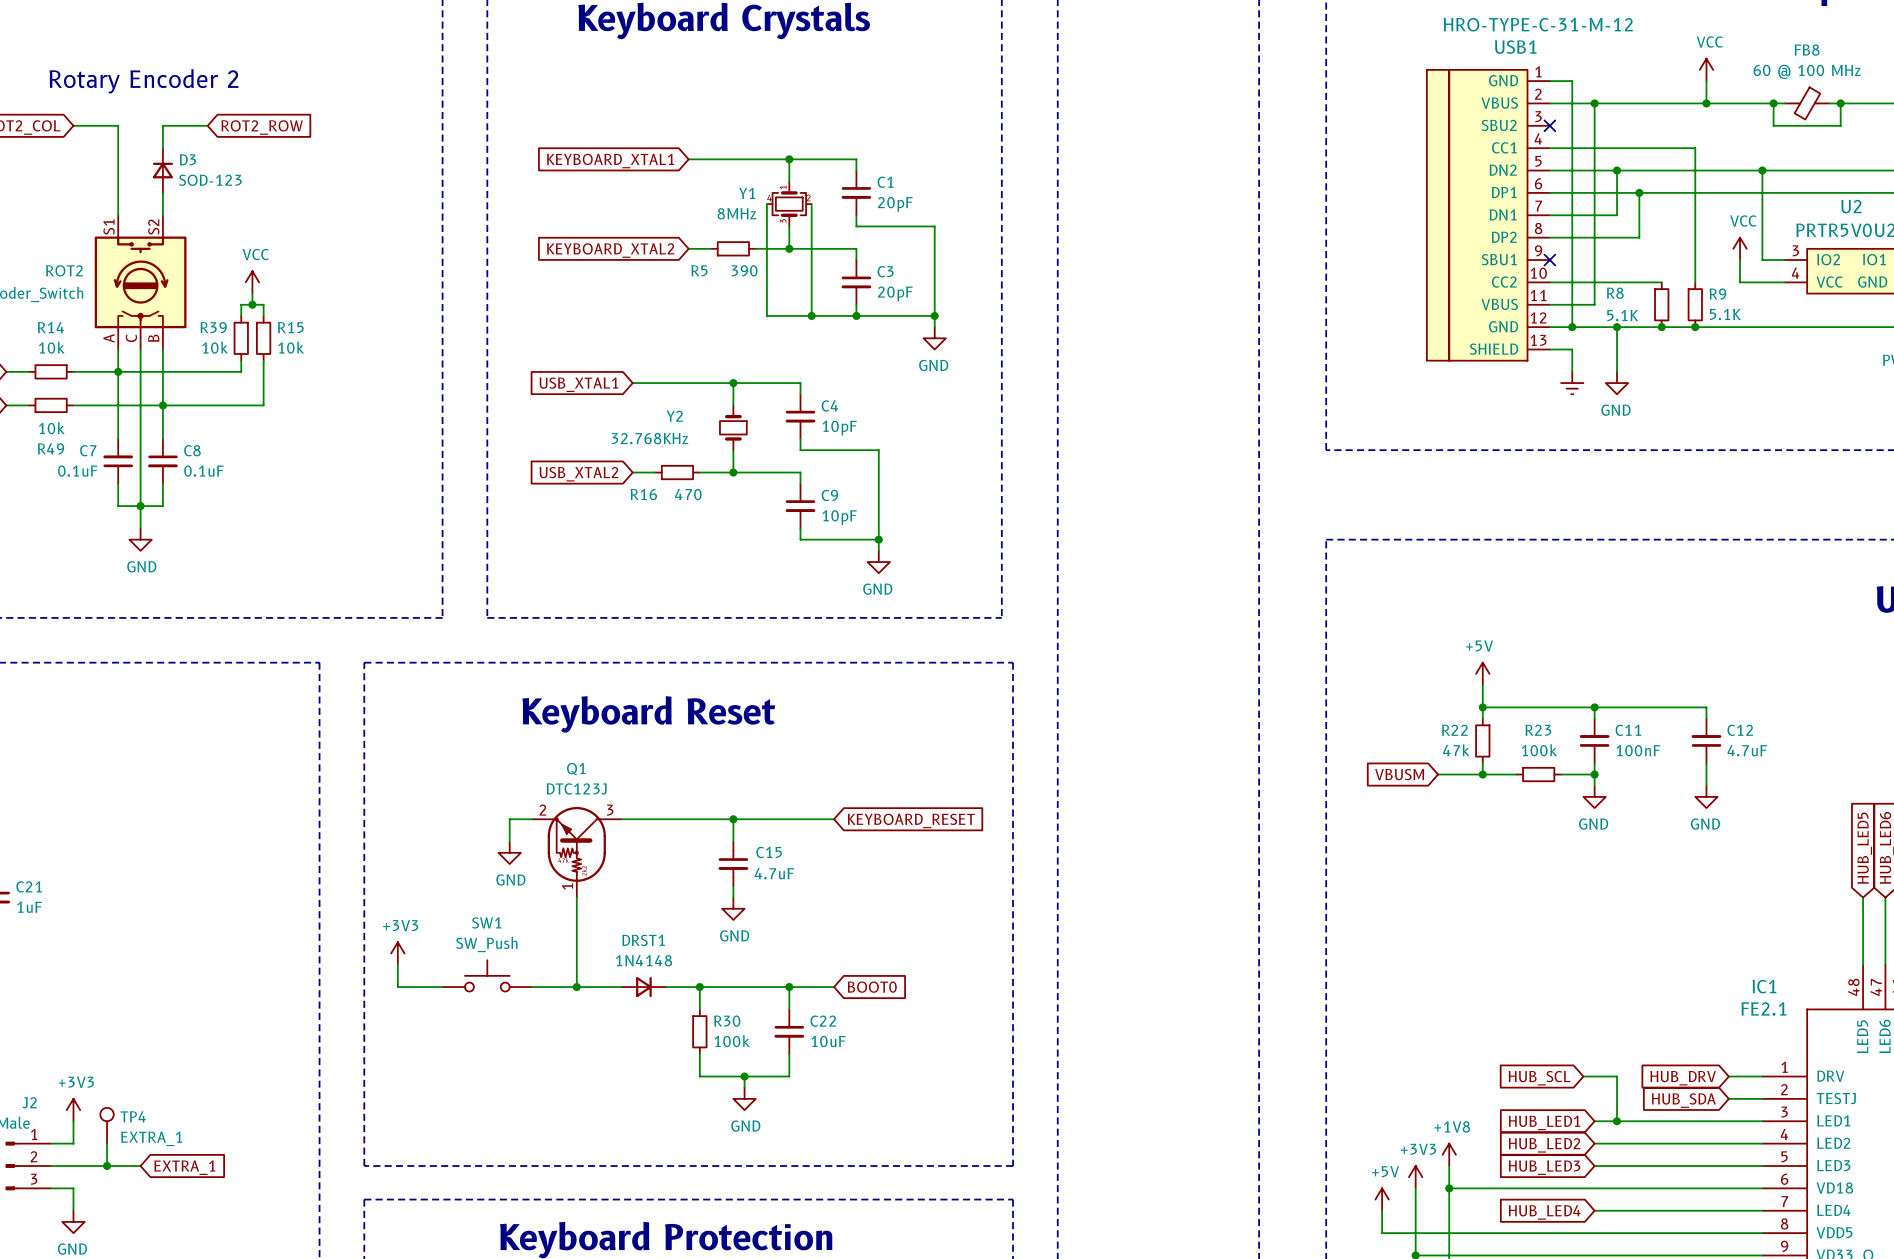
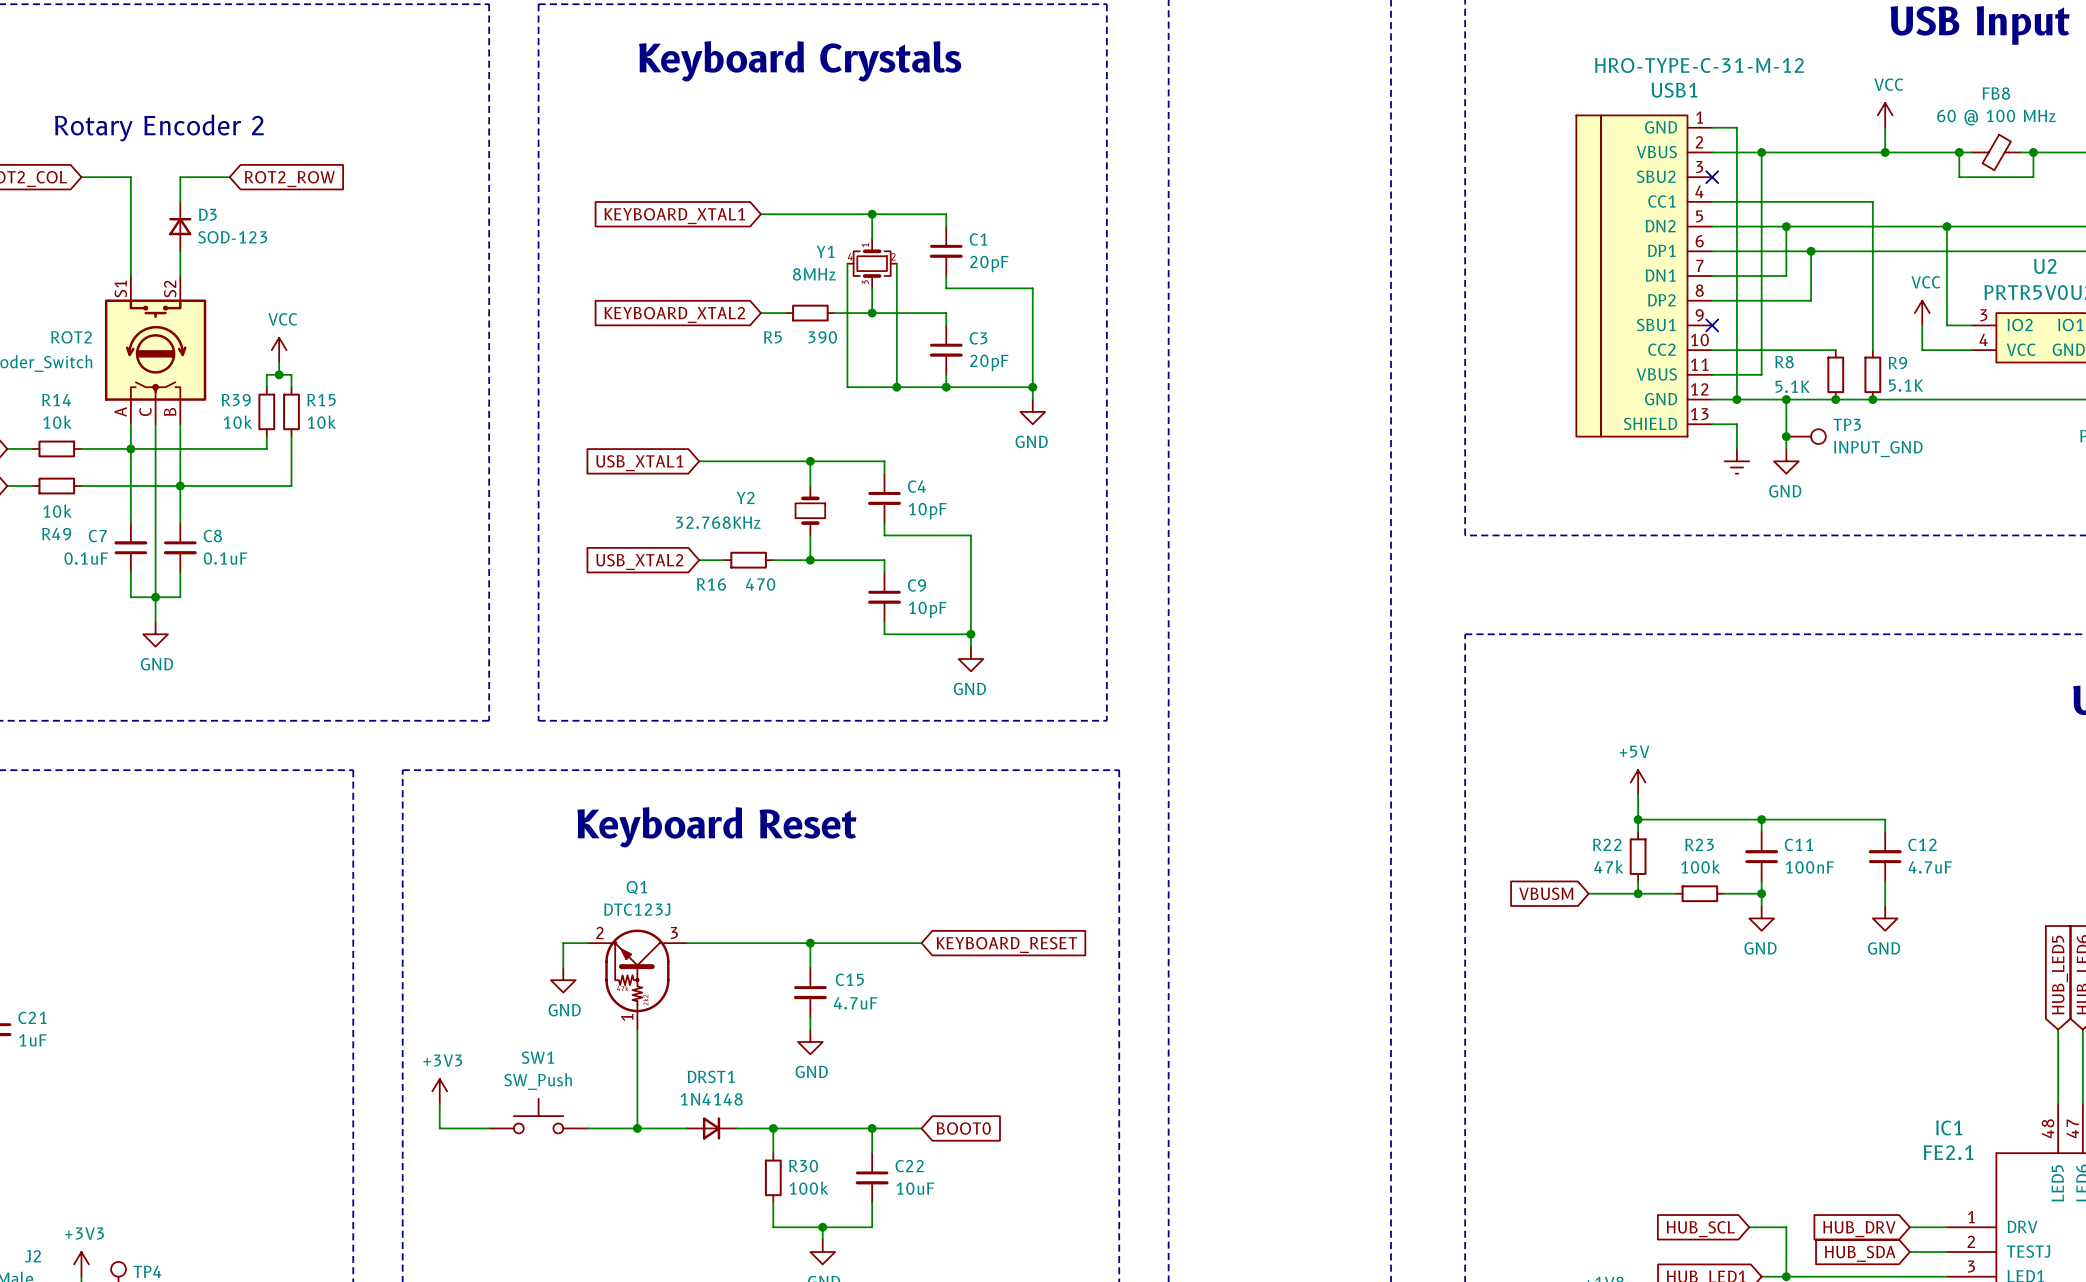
junction: none -> (1786, 436)
TP3: none -> INPUT_GND (1806, 436)

